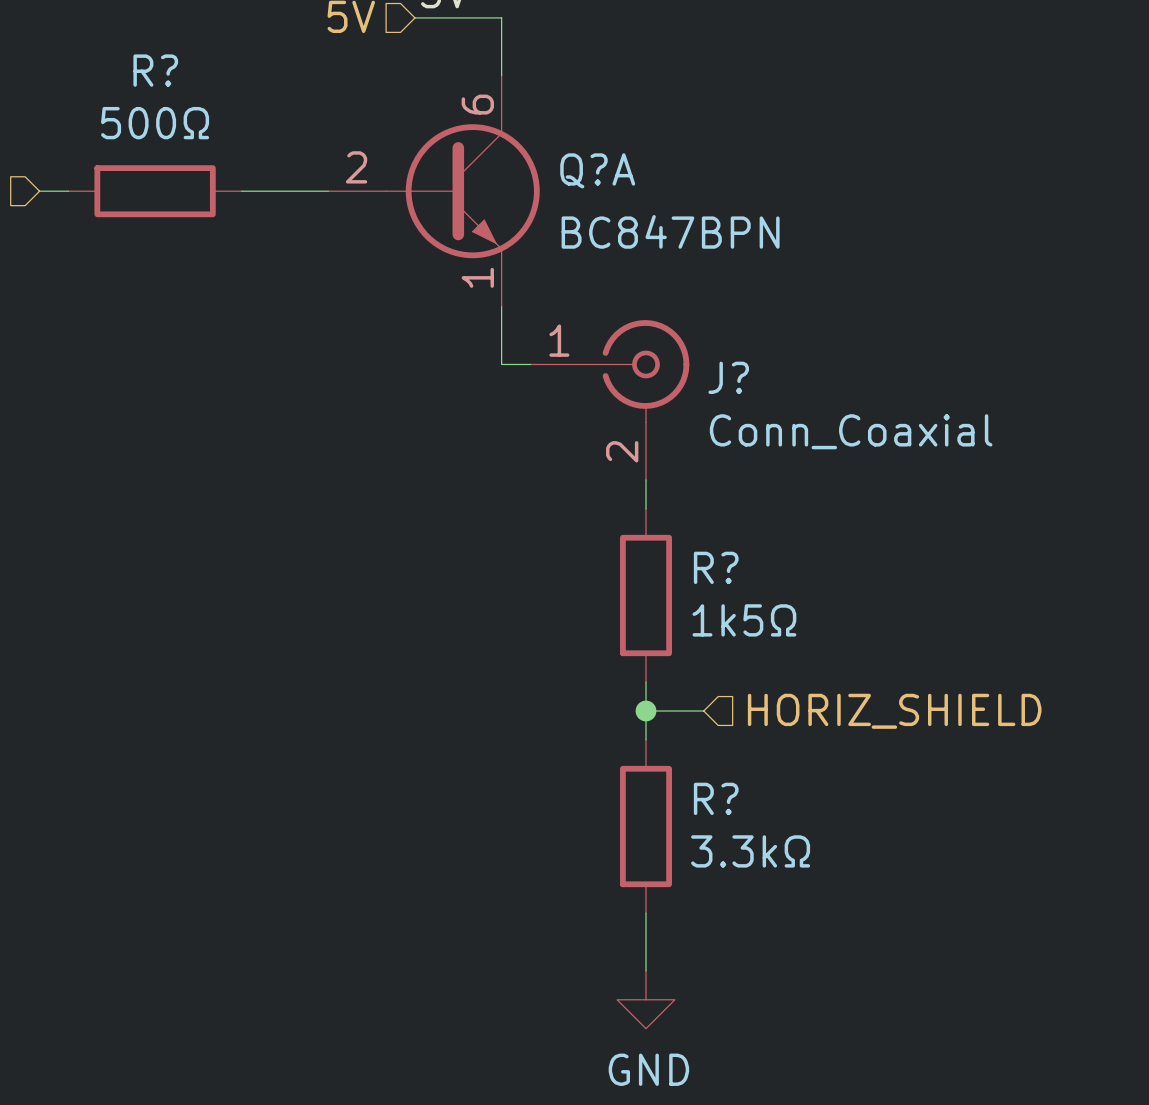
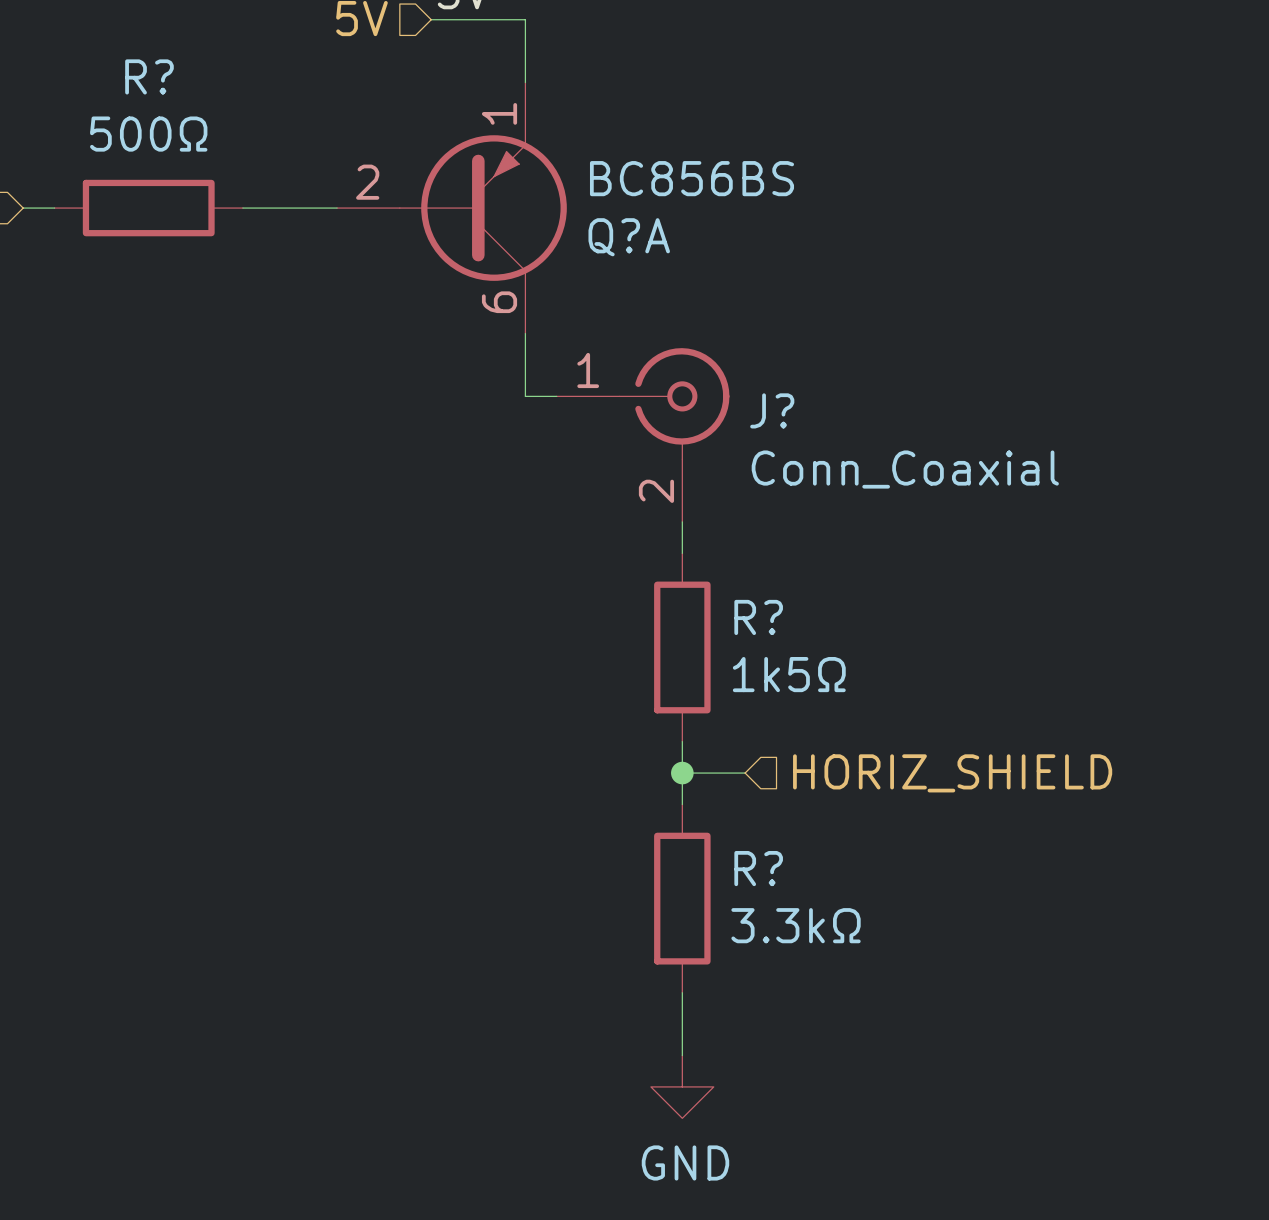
Q?A symbol: [328, 75, 540, 307] -> [337, 82, 567, 334]
Q?A name position: Q?A (597, 170) -> Q?A (629, 237)
Q?A value: BC847BPN (670, 231) -> BC856BS (691, 178)

